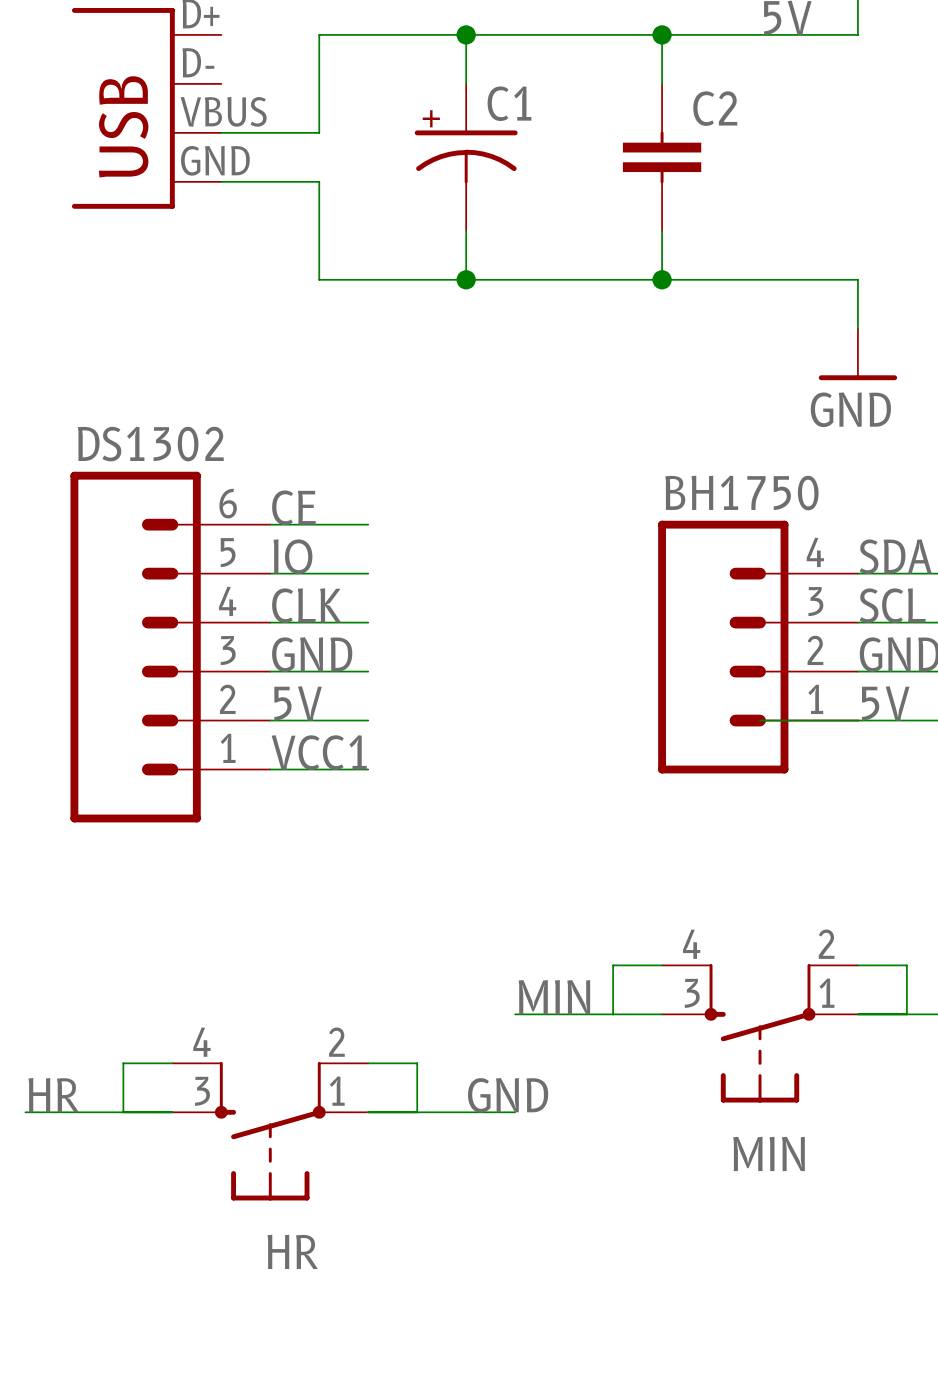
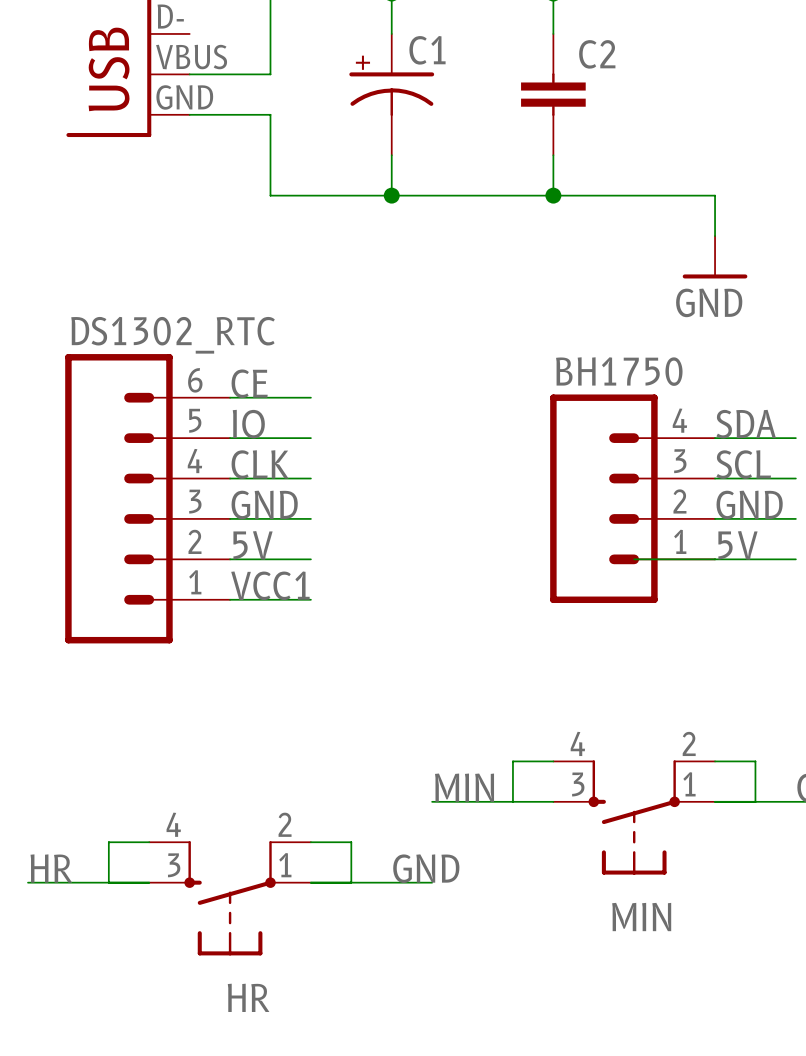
DS1302 name: DS1302 (150, 444) -> DS1302_RTC (173, 335)

